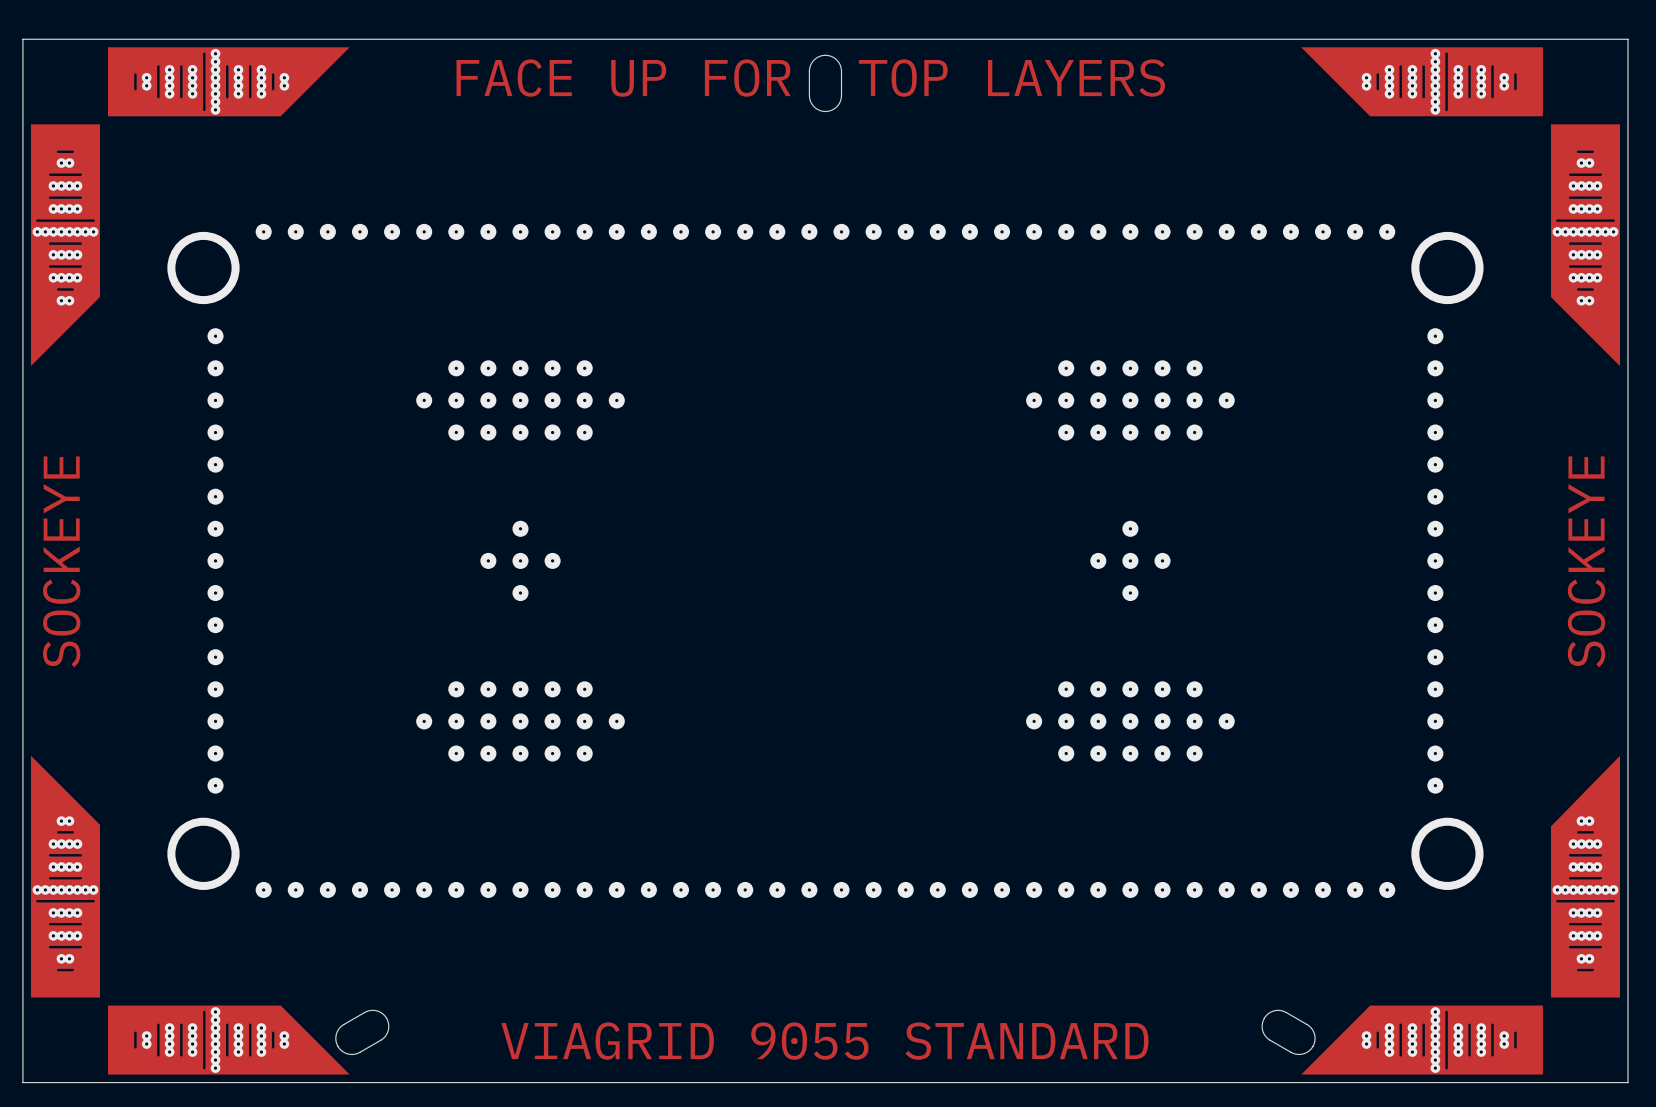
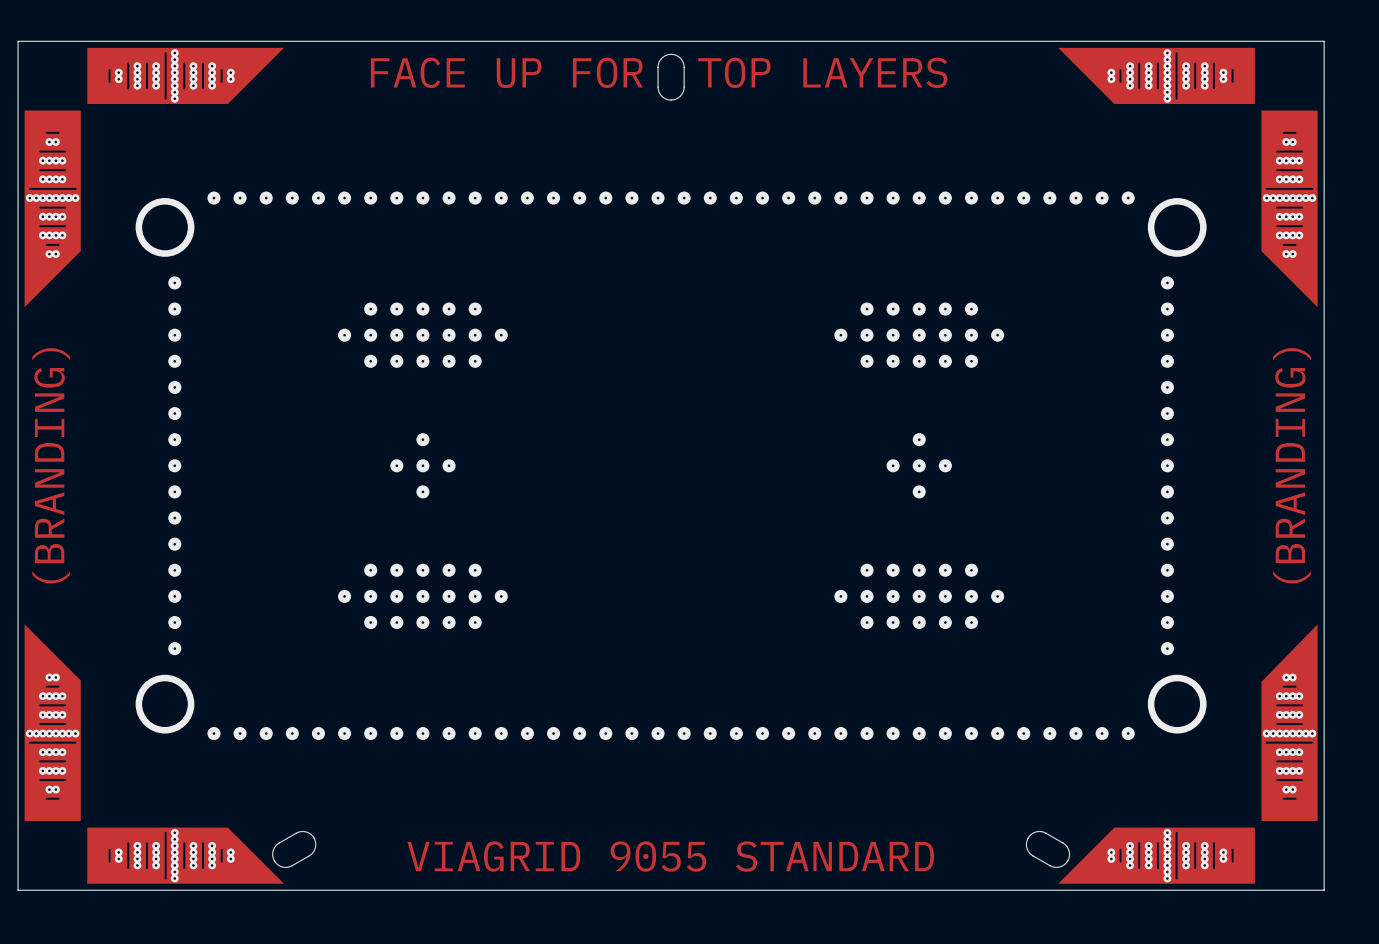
text: SOCKEYE (61, 561) -> (BRANDING) (51, 465)
text: SOCKEYE (1586, 561) -> (BRANDING) (1291, 465)

